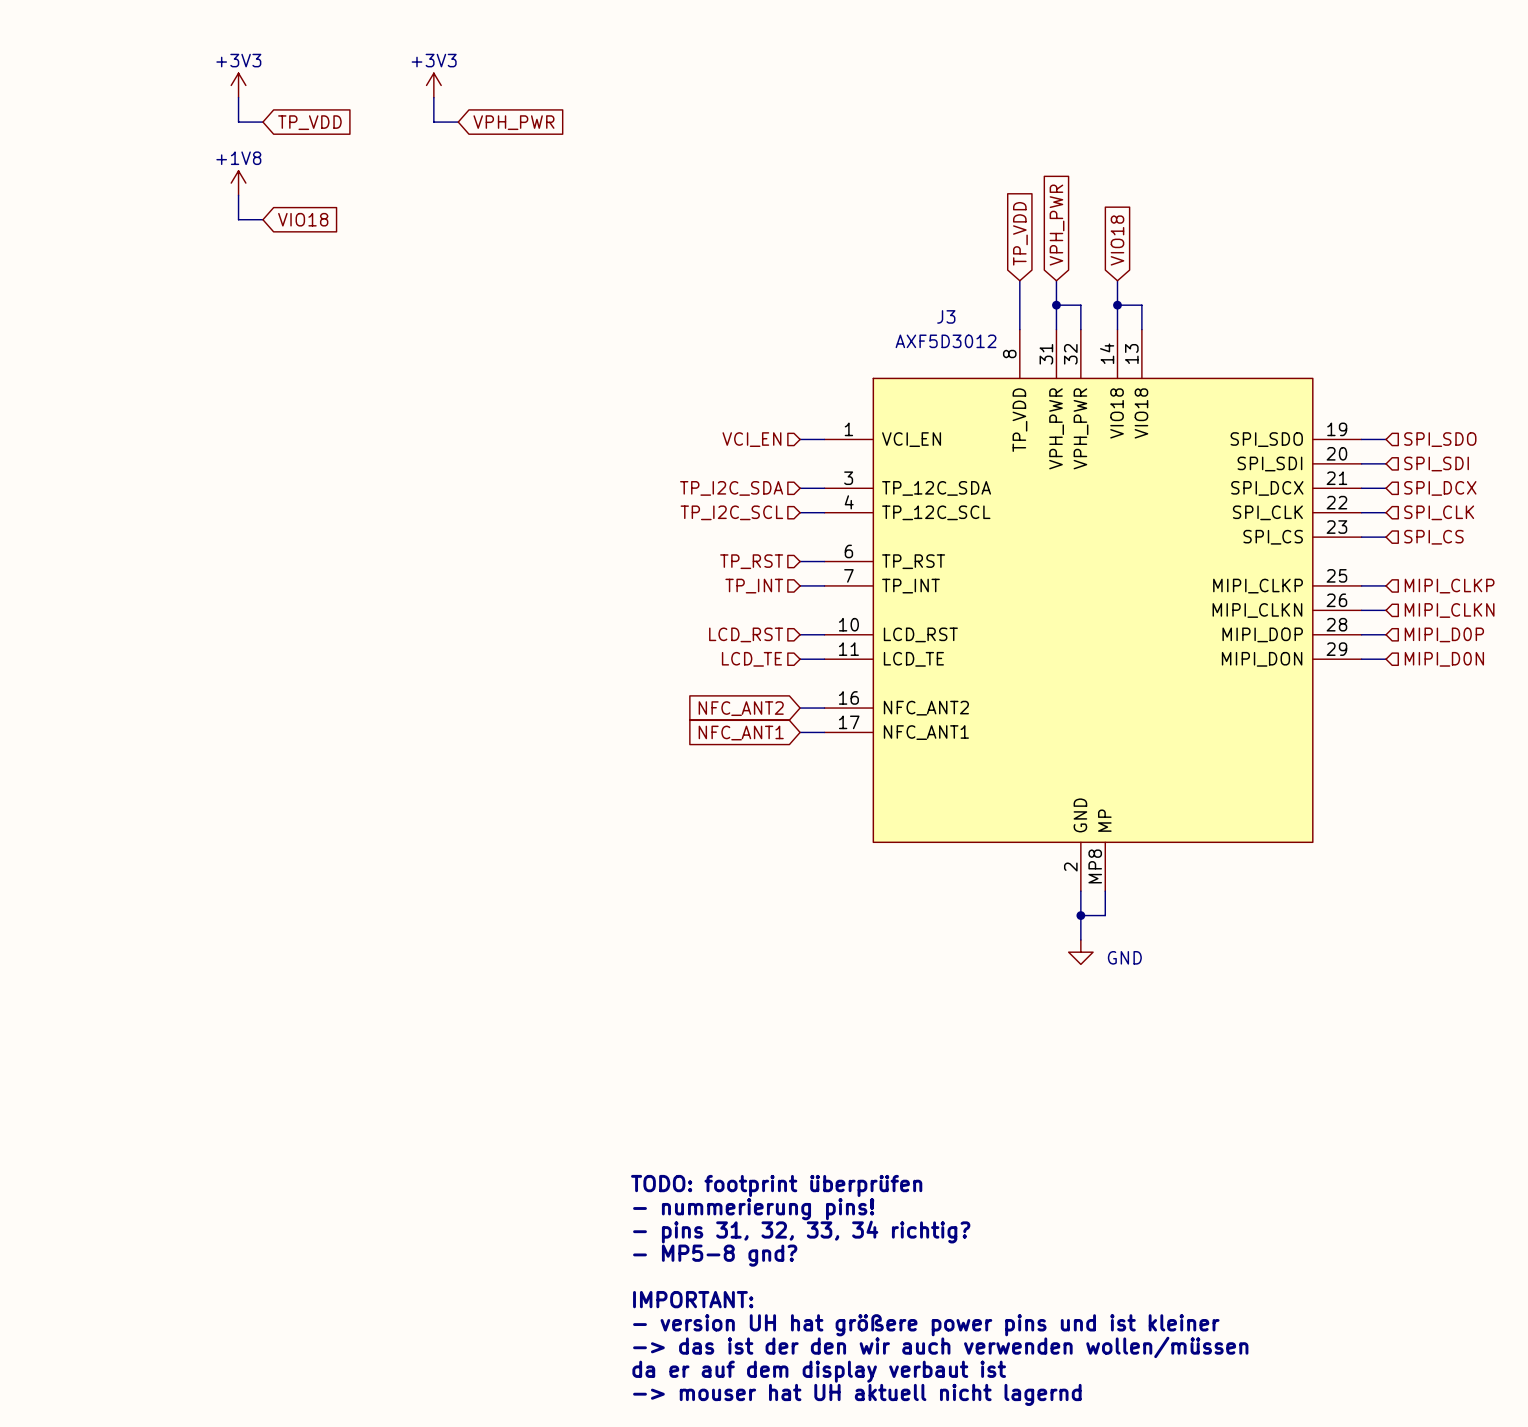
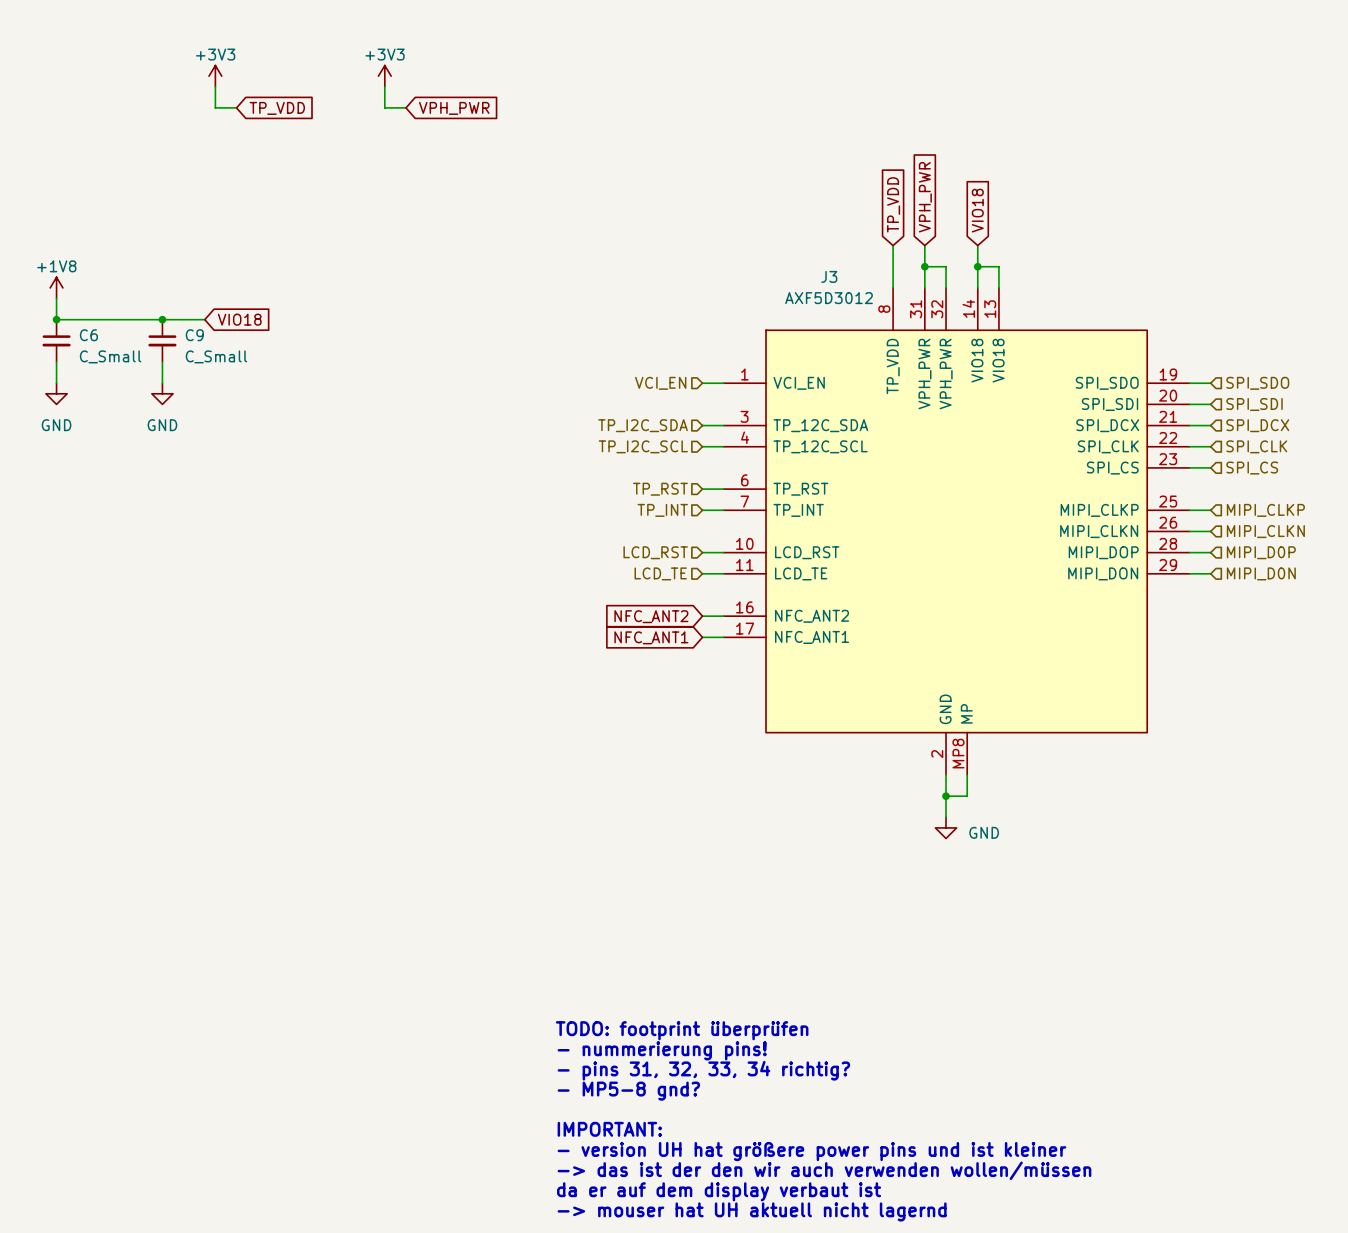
power symbol position: +1V8 (238, 183) -> +1V8 (56, 287)
wire: (238, 195) (238, 219) (262, 219) -> none
global label position: VIO18 (303, 219) -> VIO18 (239, 319)
wire: none -> (56, 298) (56, 319) (204, 319)
junction: none -> (56, 319)
junction: none -> (162, 319)
C6: none -> C_Small (56, 340)
C9: none -> C_Small (162, 340)
wire: none -> (56, 362) (56, 383)
wire: none -> (162, 362) (162, 383)
power symbol: none -> GND (56, 393)
power symbol: none -> GND (162, 393)

